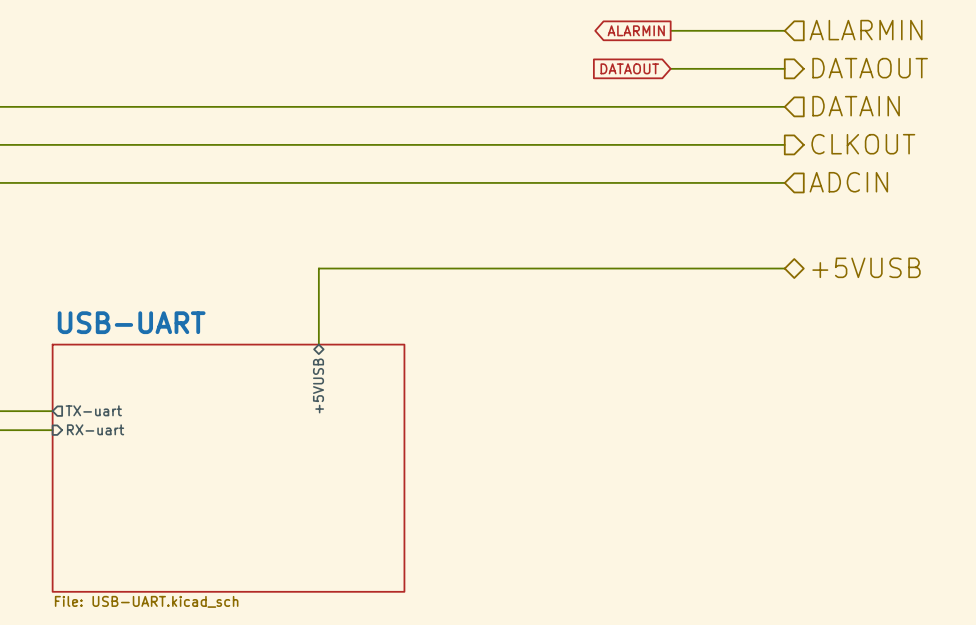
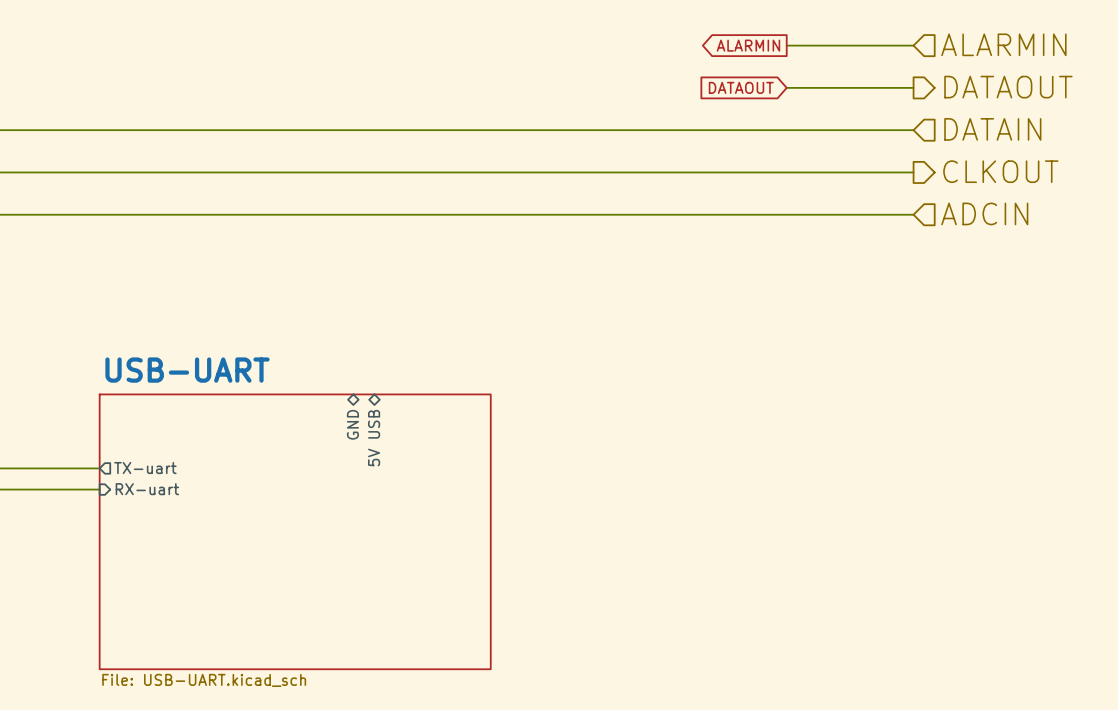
hierarchical label: +5VUSB (866, 267) -> none
wire: (784, 268) (318, 268) (318, 344) -> none
sheet pin: none -> GND (352, 424)
sheet pin: +5VUSB (318, 385) -> 5V USB (374, 438)

